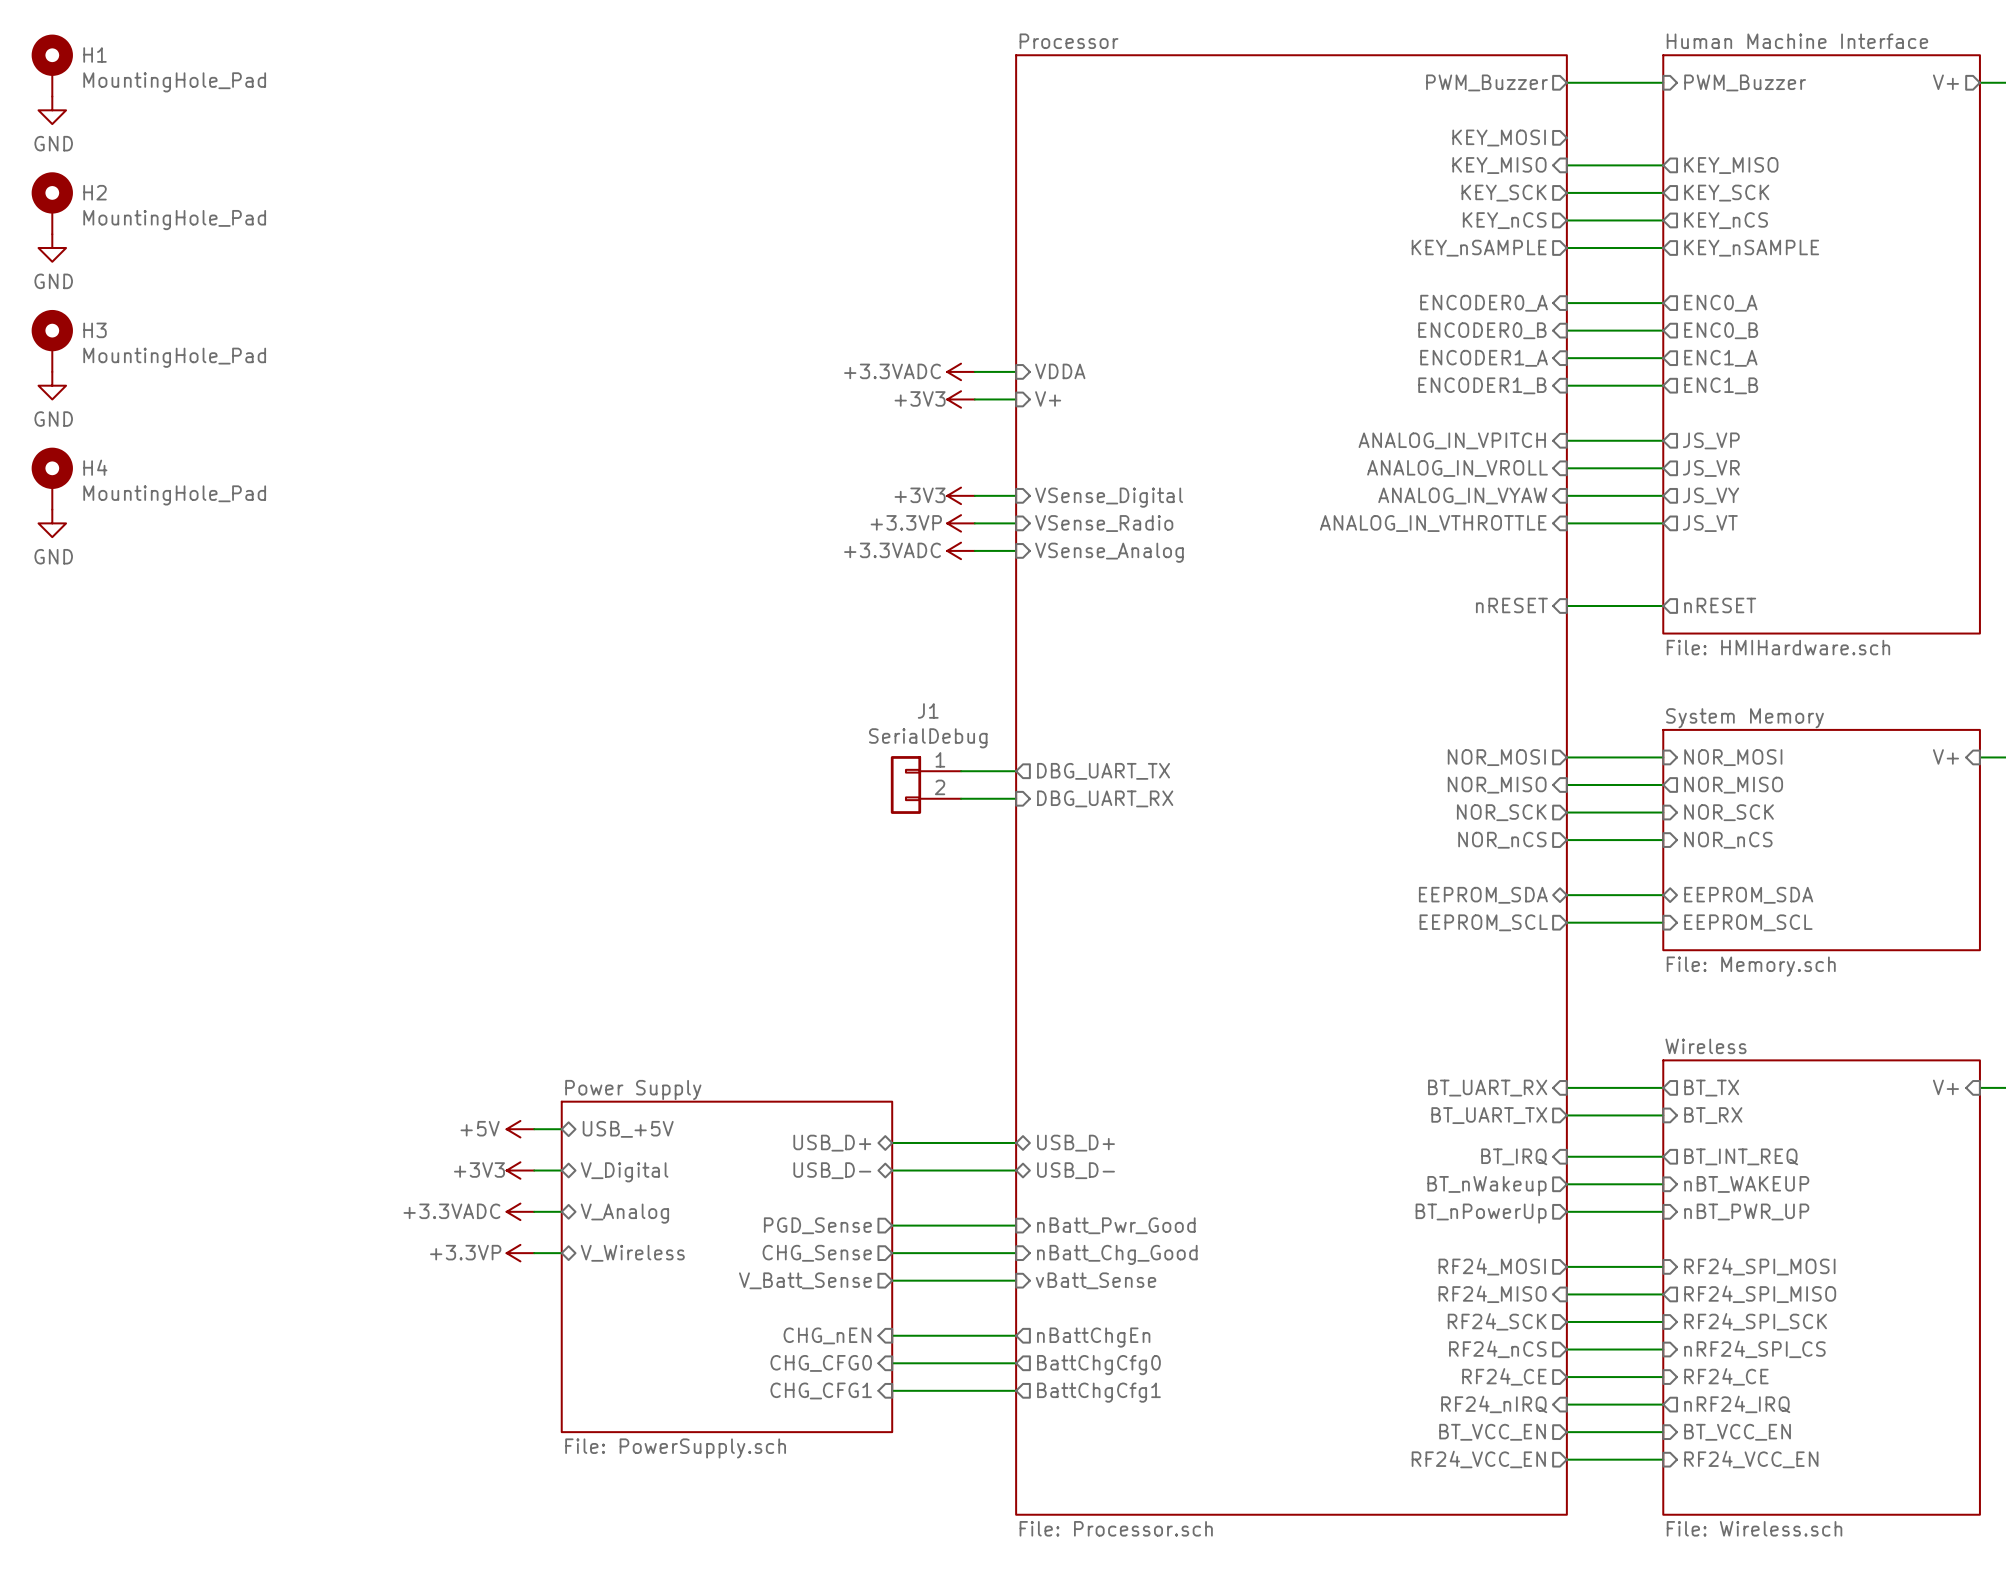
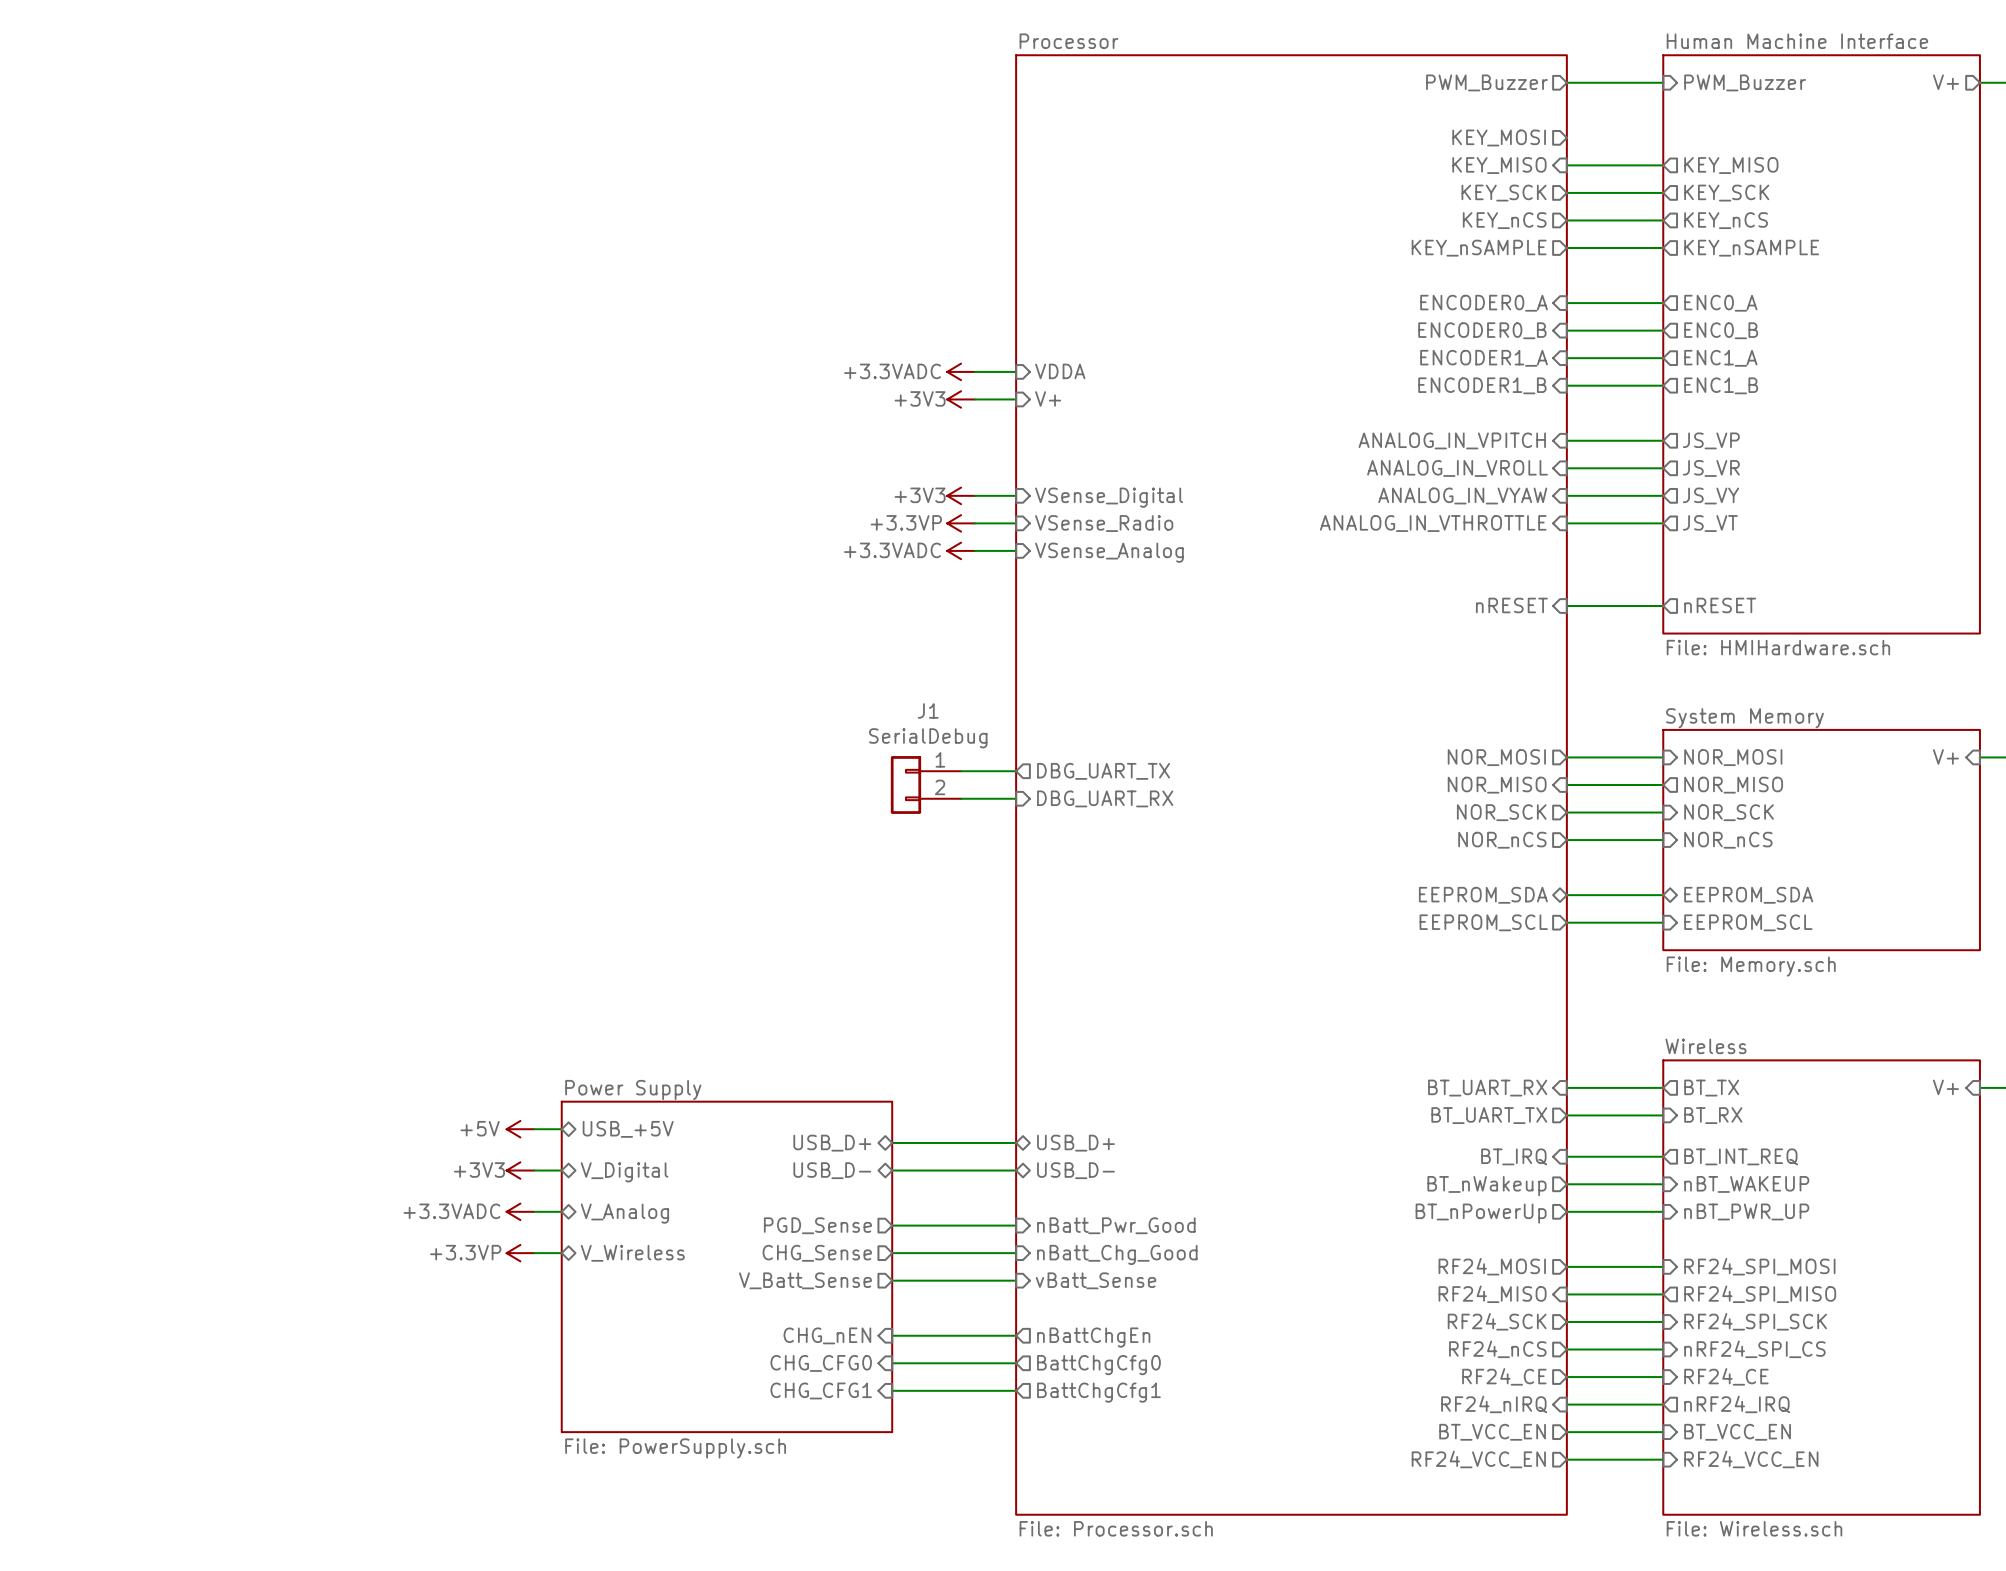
H1: MountingHole_Pad (52, 65) -> none
power symbol: GND (52, 110) -> none
H2: MountingHole_Pad (52, 203) -> none
power symbol: GND (52, 248) -> none
H3: MountingHole_Pad (52, 340) -> none
power symbol: GND (52, 385) -> none
H4: MountingHole_Pad (52, 478) -> none
power symbol: GND (52, 523) -> none

